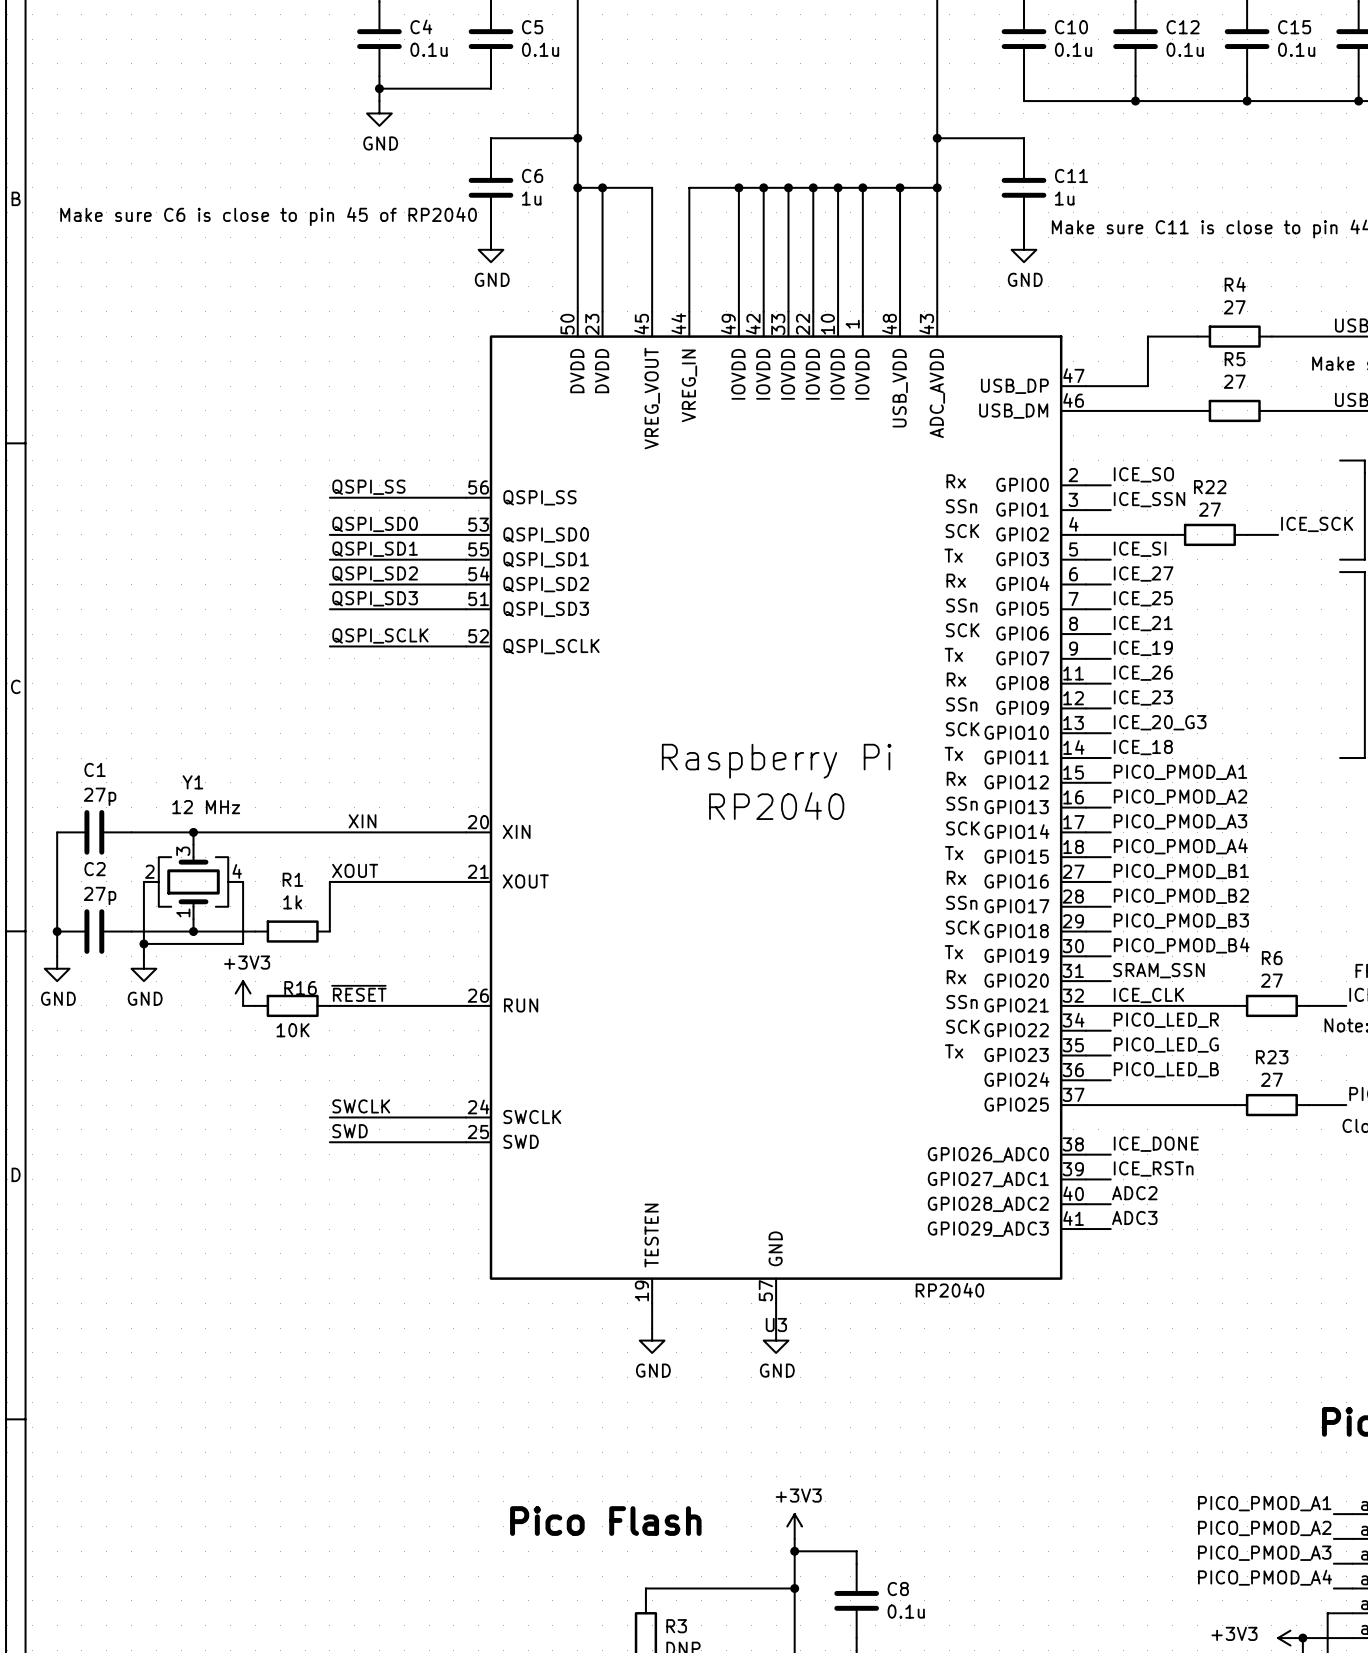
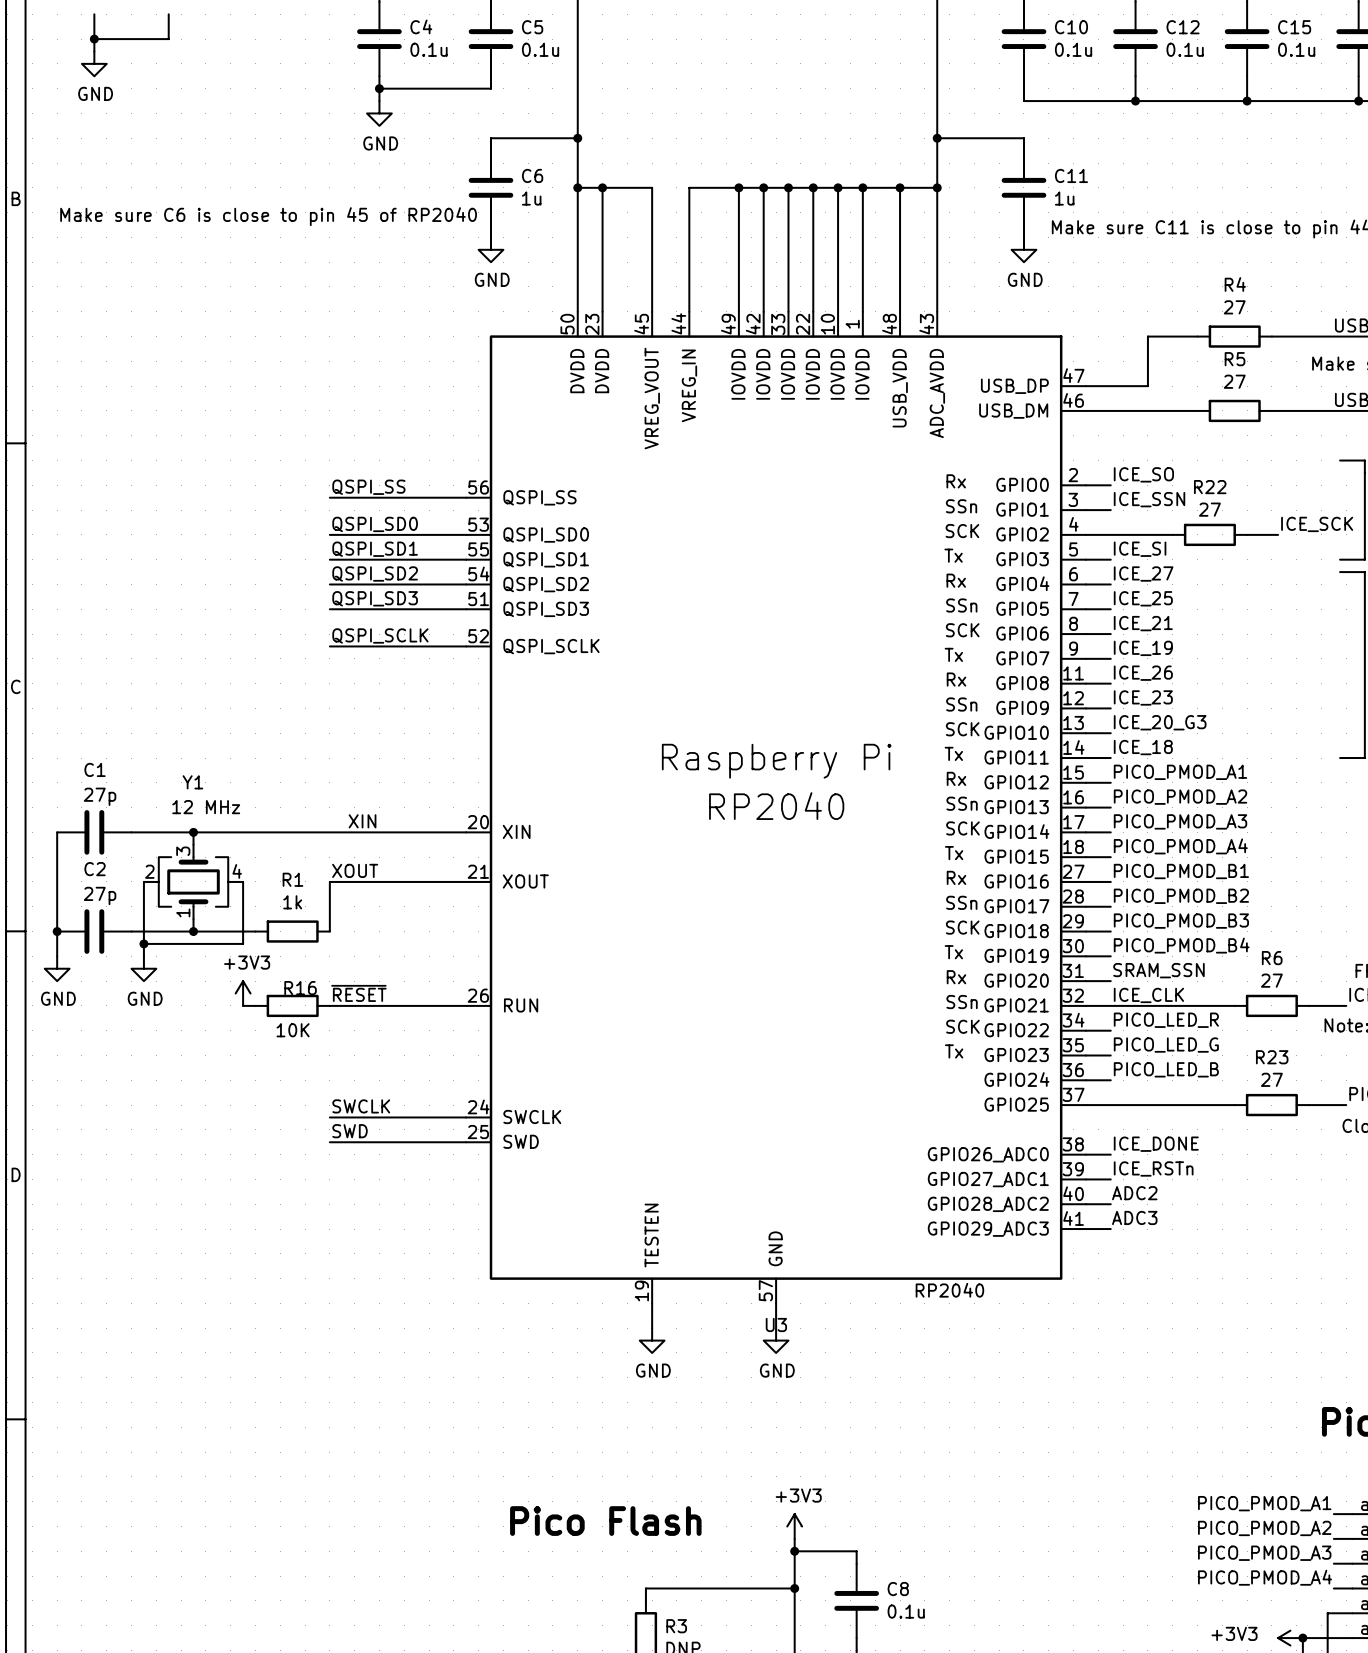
wire: none -> (94, 14) (94, 51)
wire: none -> (168, 14) (168, 39) (94, 39)
junction: none -> (94, 39)
power symbol: none -> GND (94, 63)

